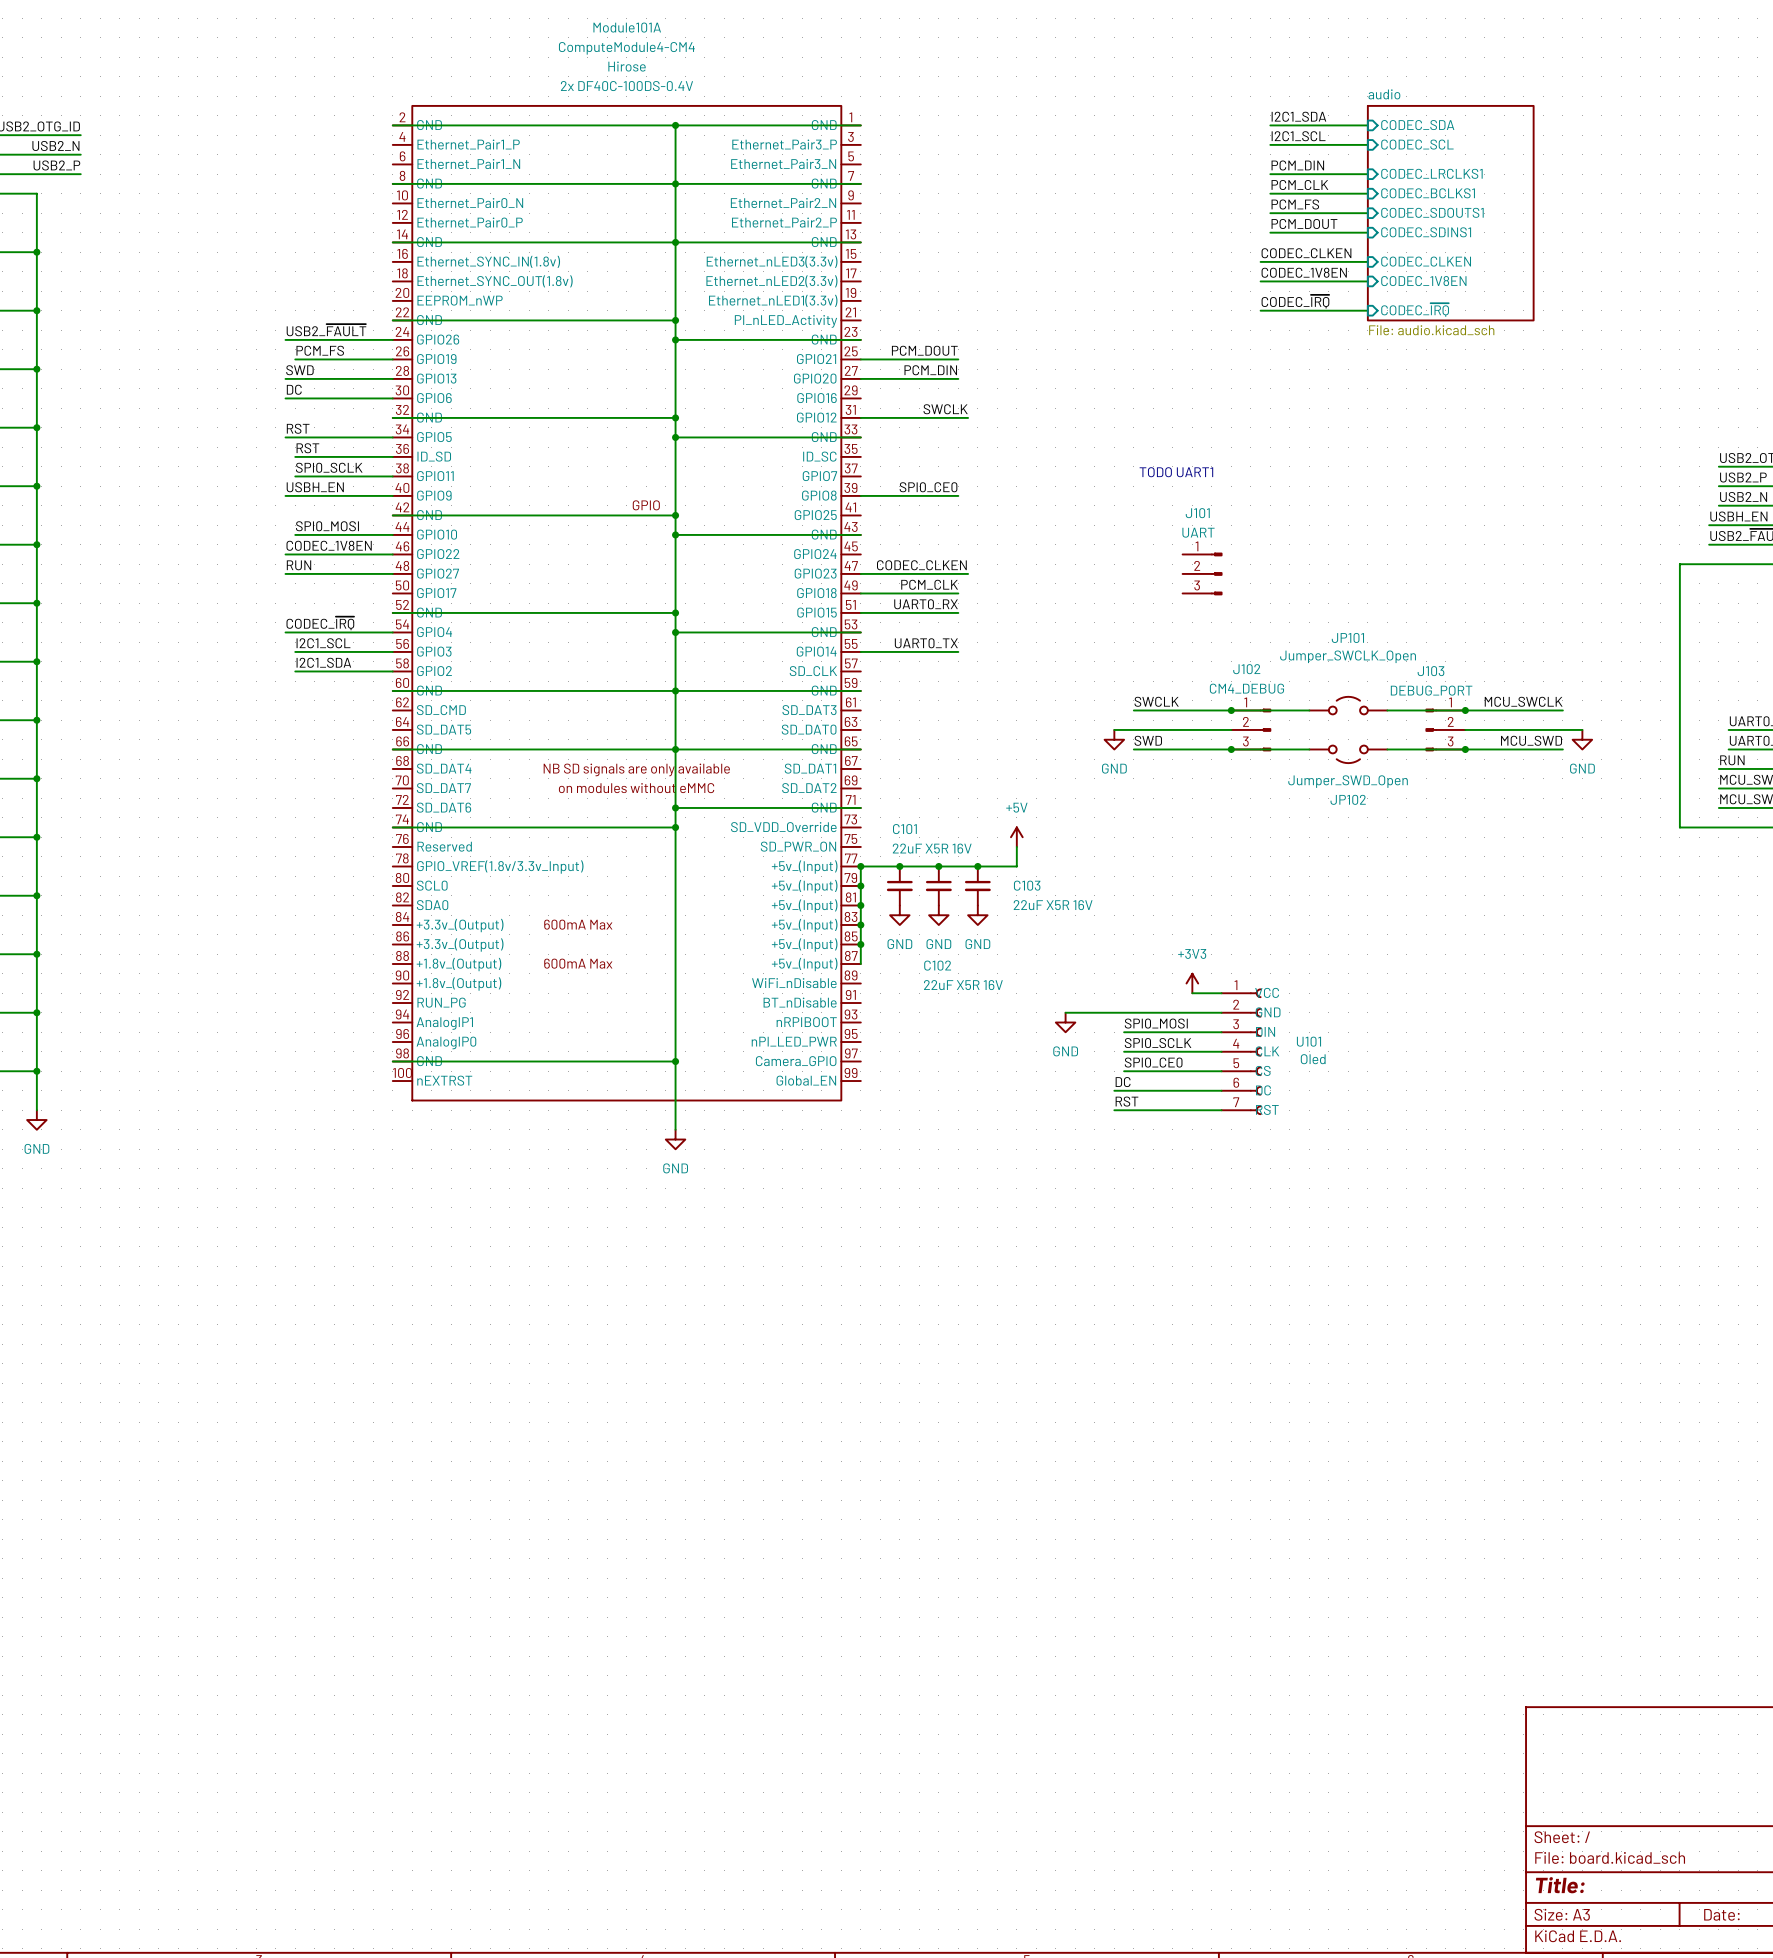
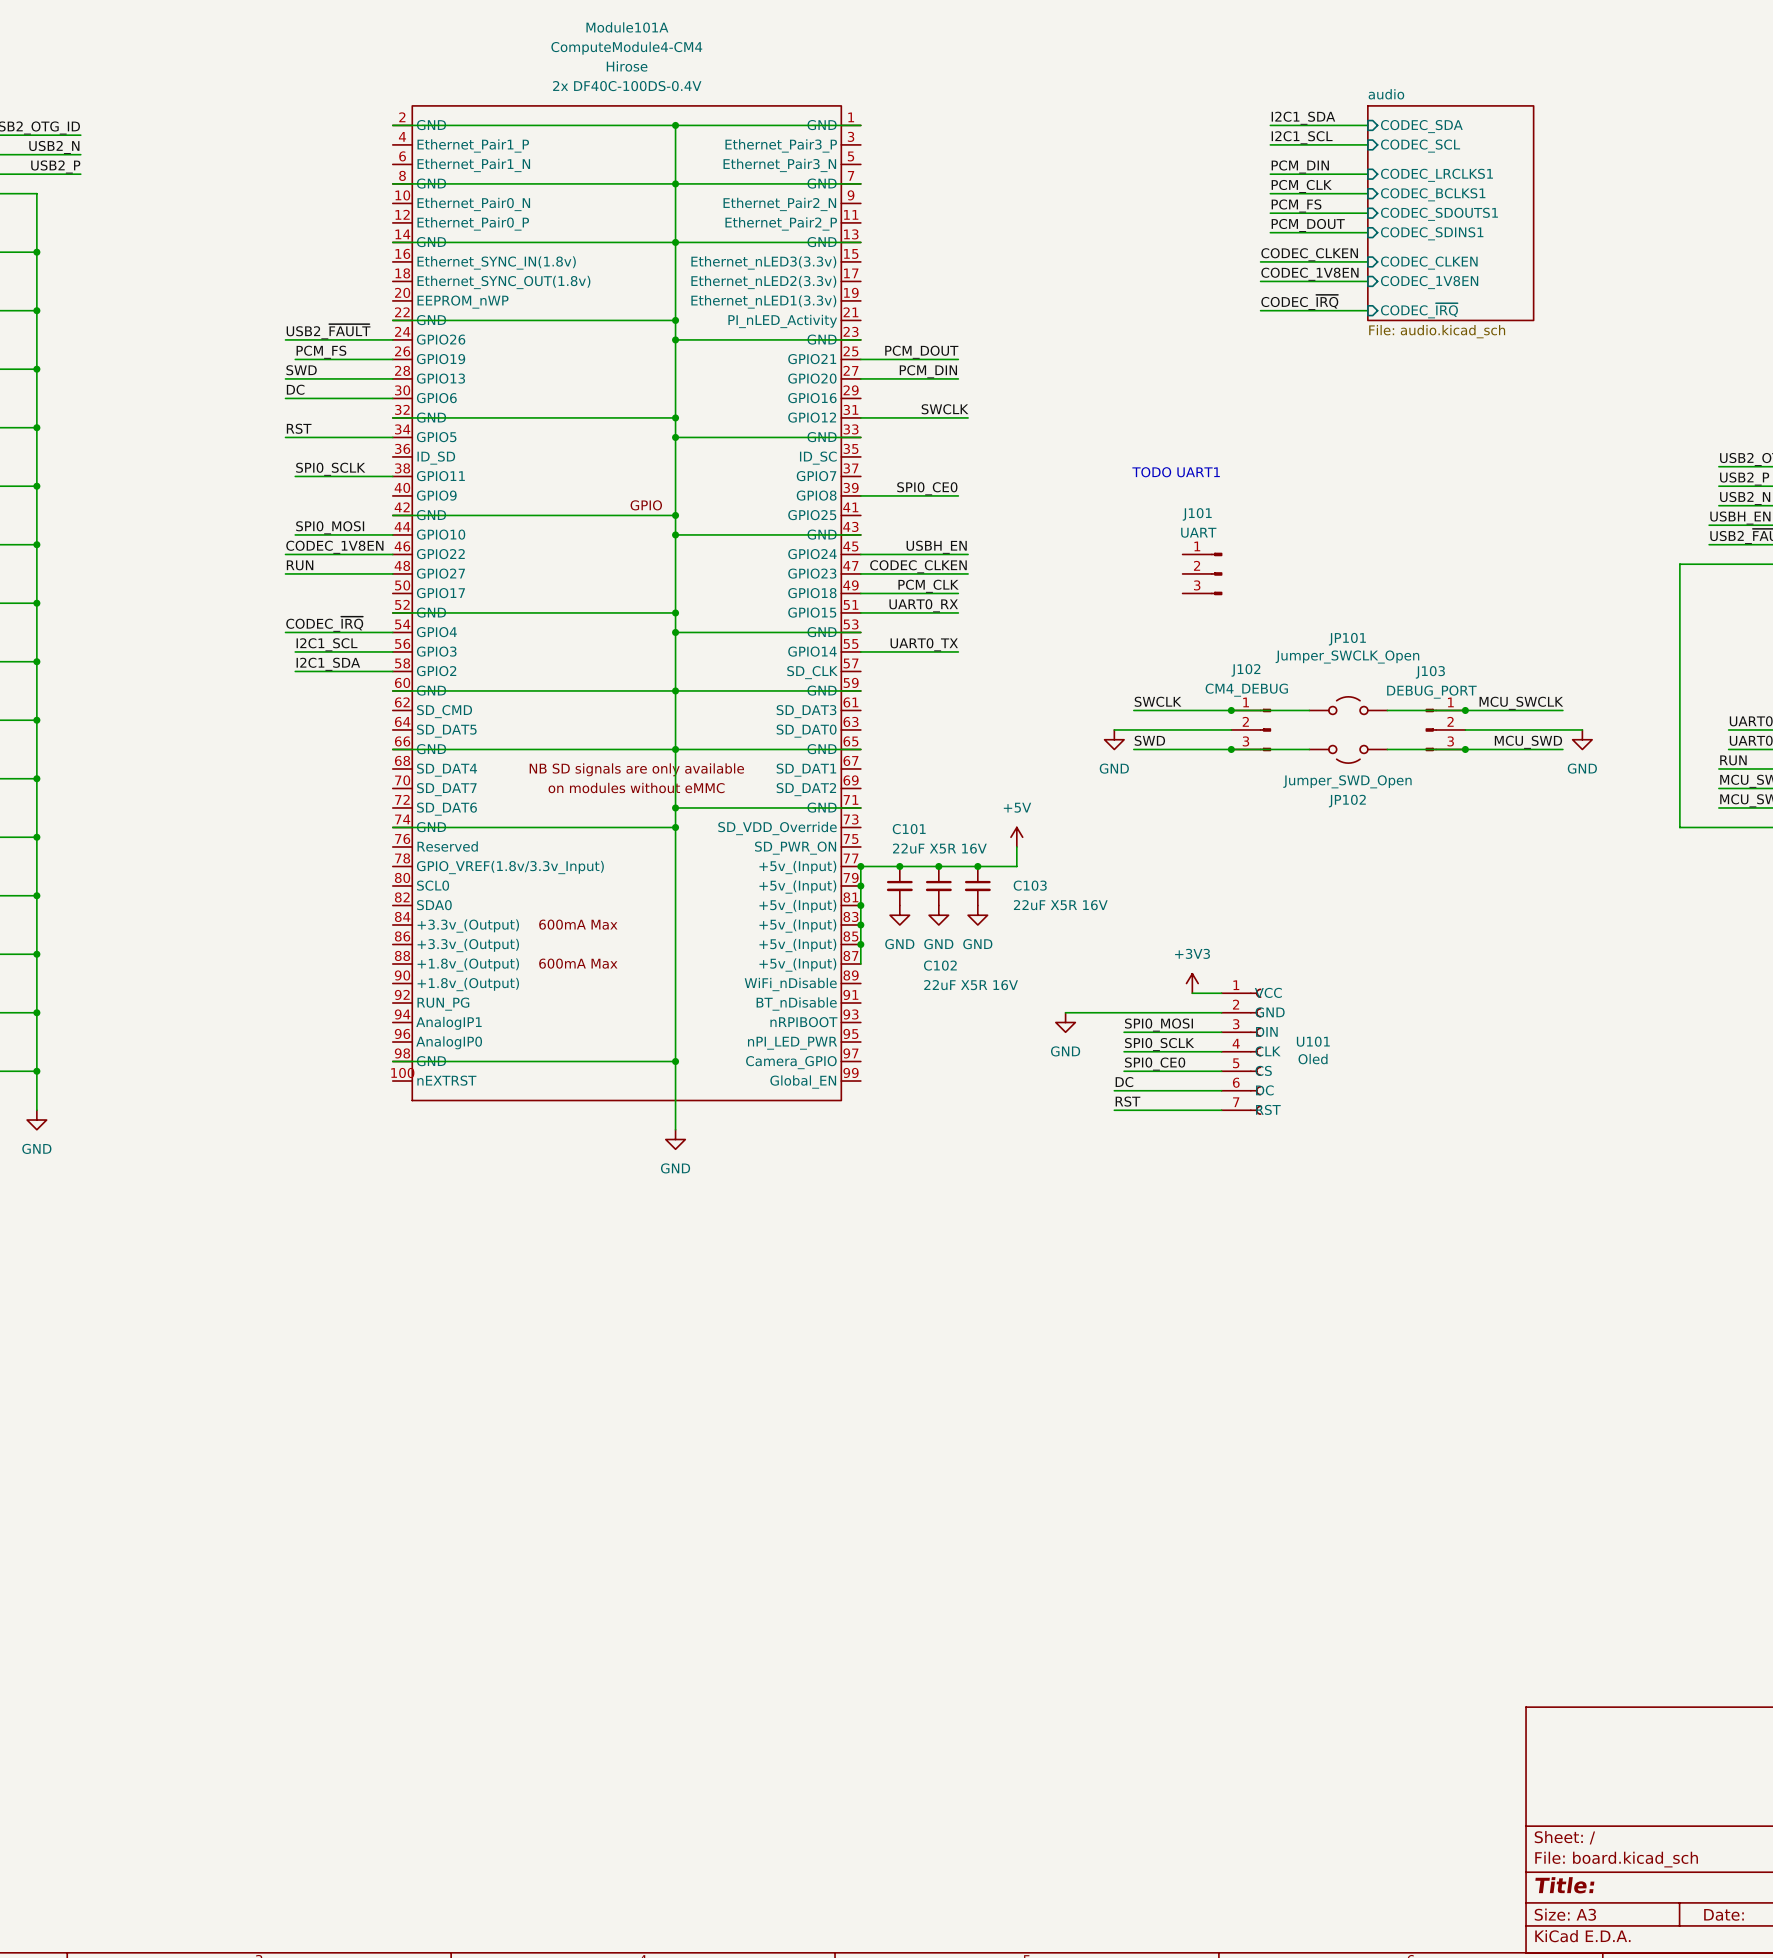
label: RST (307, 448) -> none
wire: (295, 456) (392, 456) -> none
label: USBH_EN (315, 487) -> none
wire: (285, 495) (392, 495) -> none
label: none -> USBH_EN (936, 547)
wire: none -> (860, 554) (968, 554)

